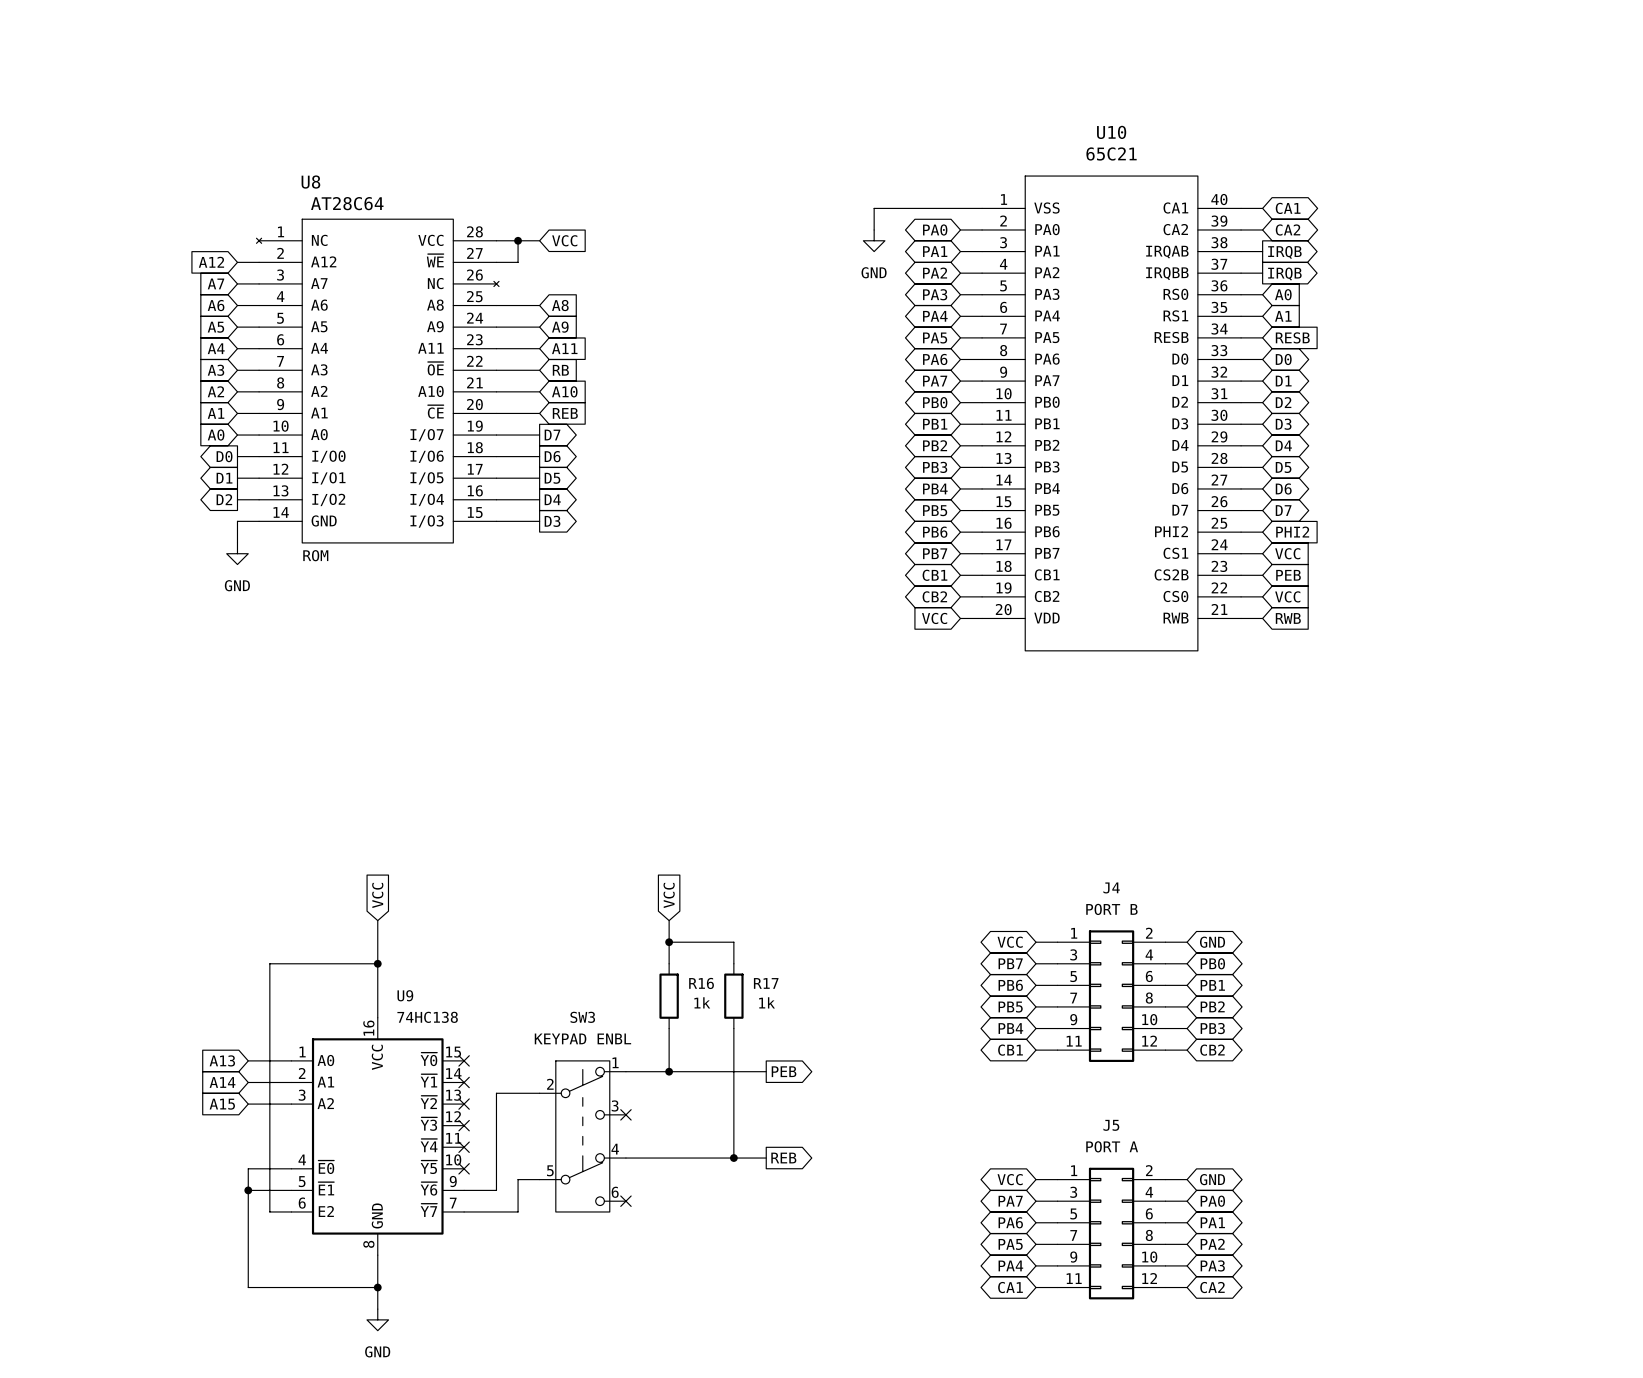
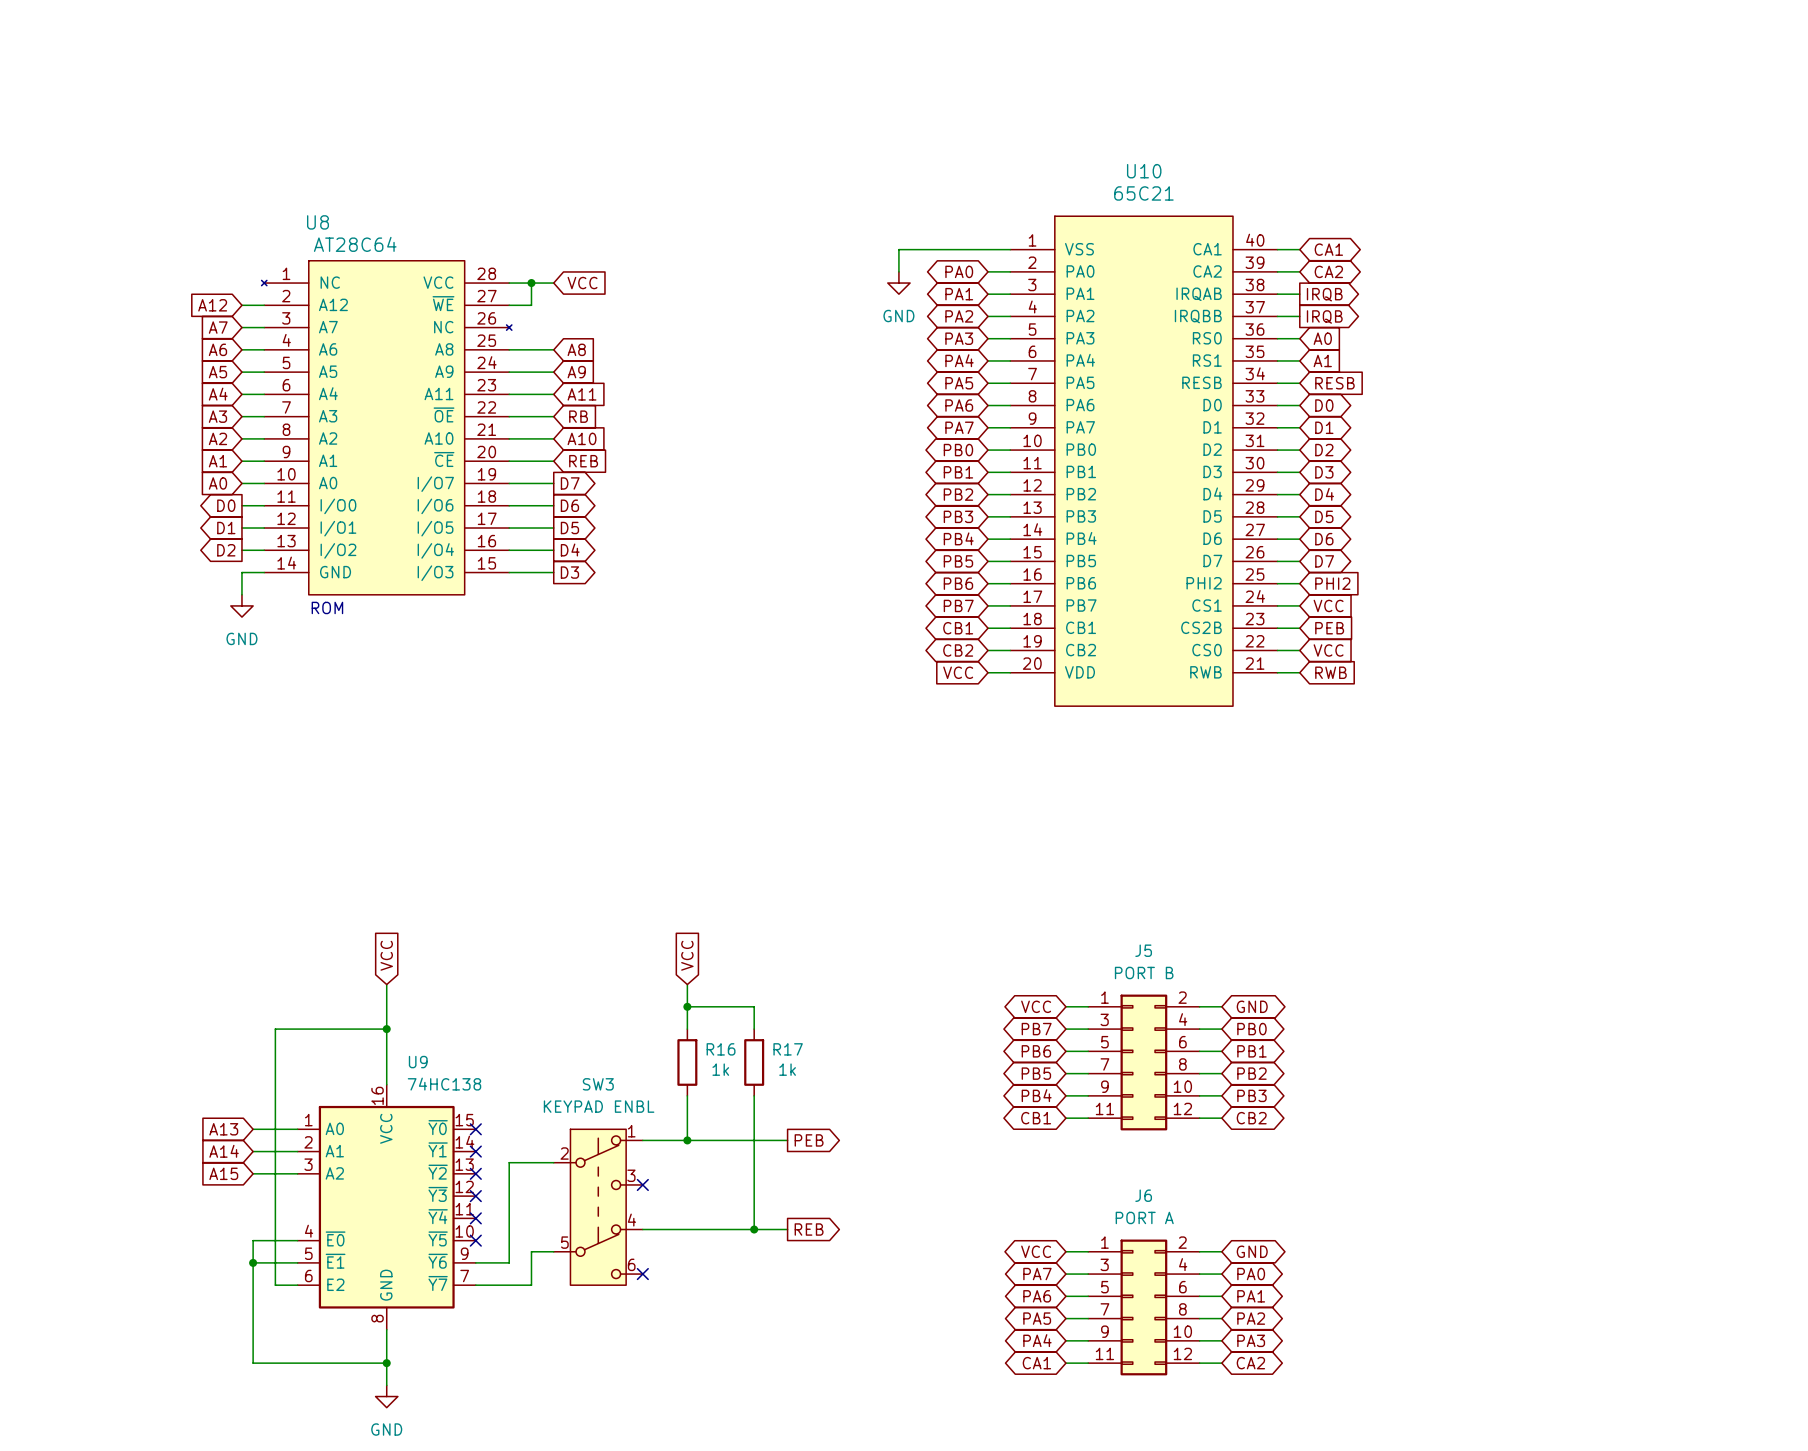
J4 name: J4 (1111, 887) -> J5 (1143, 950)
J5 name: J5 (1111, 1125) -> J6 (1143, 1195)

